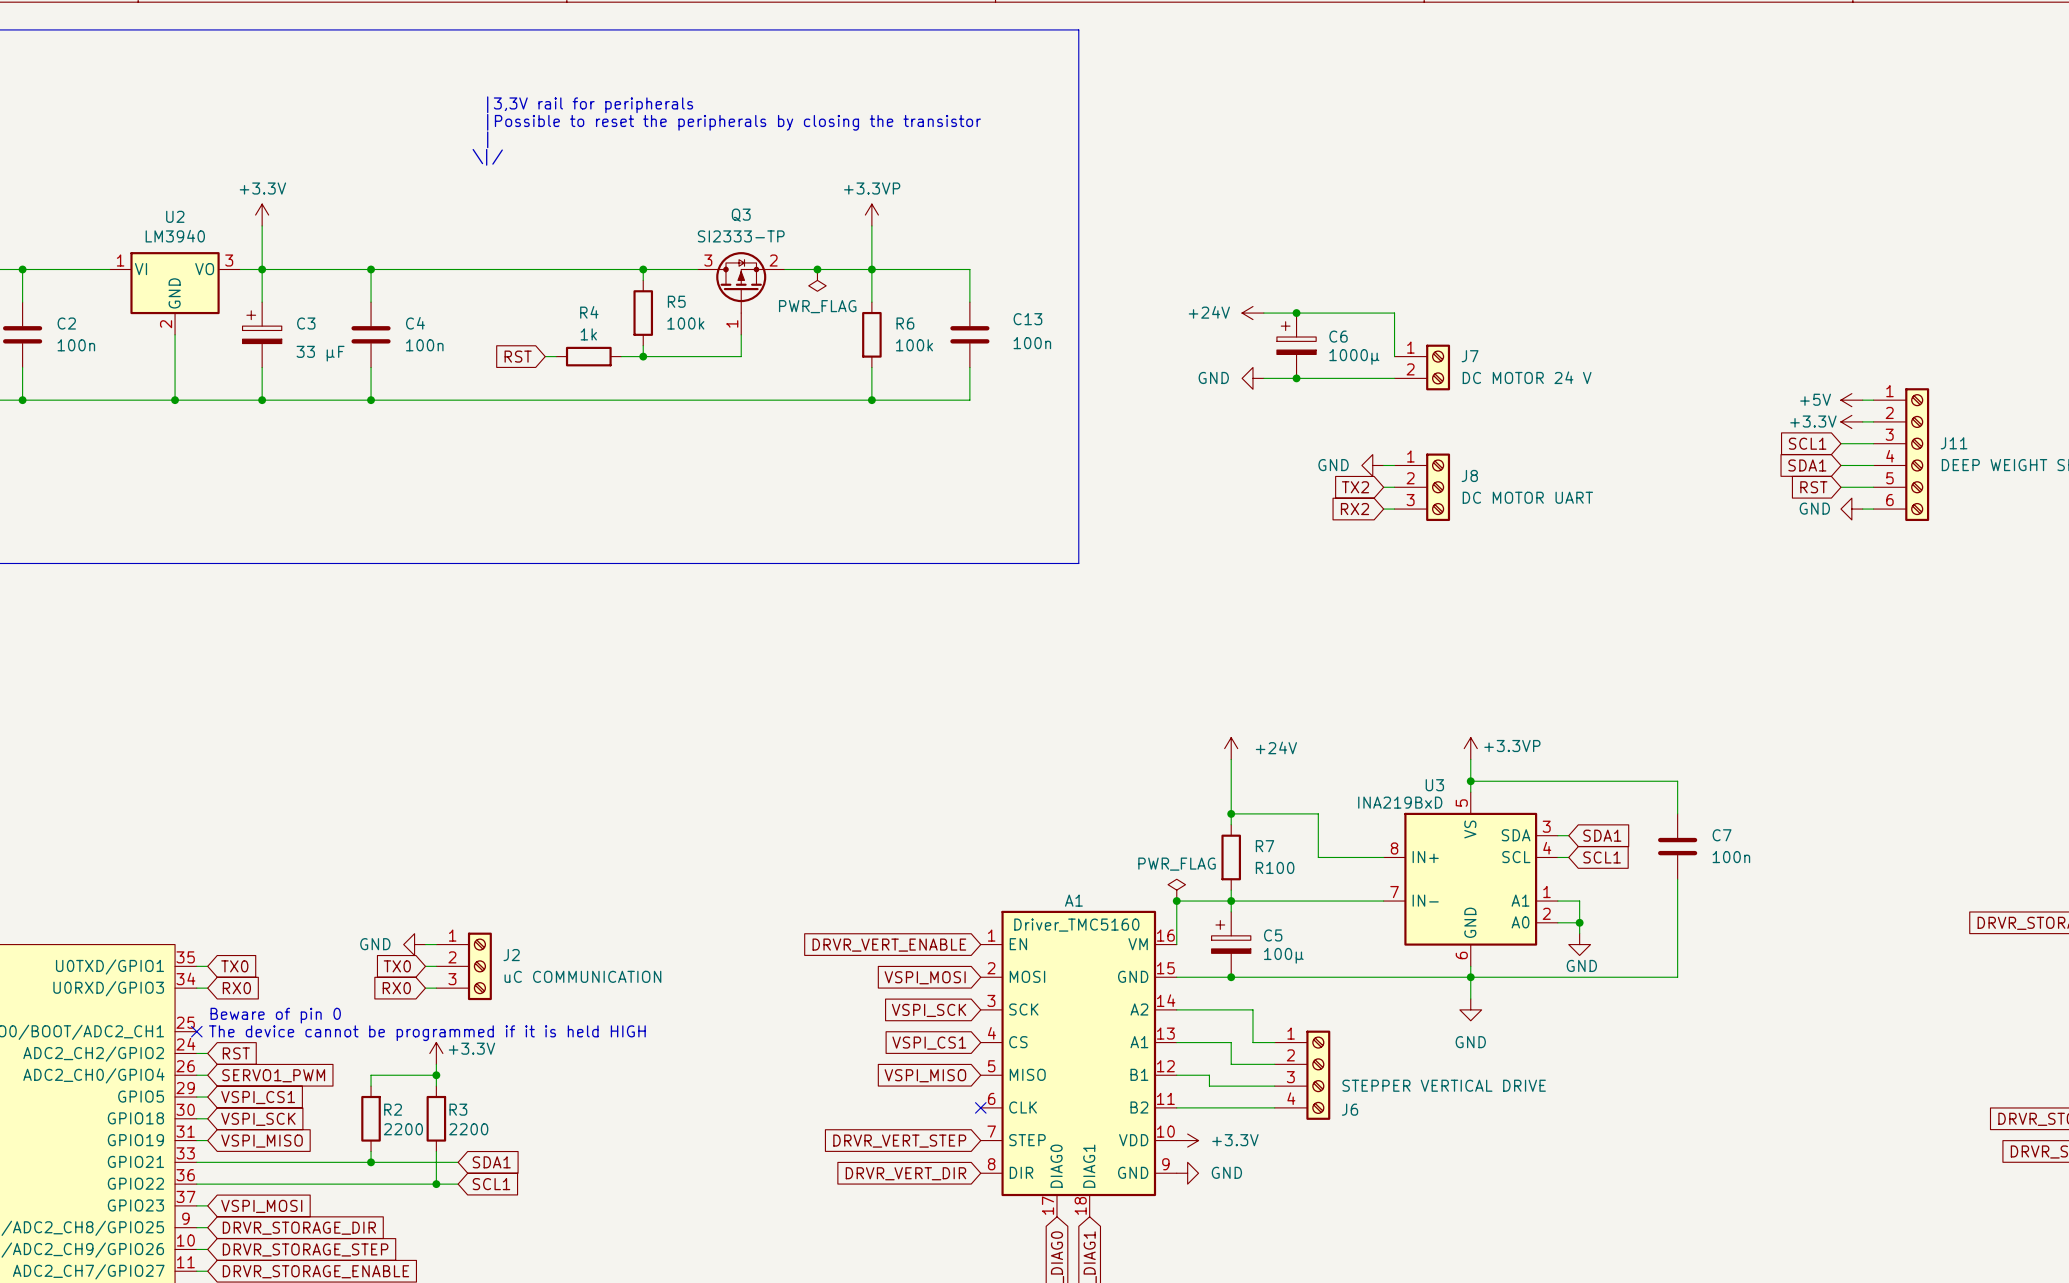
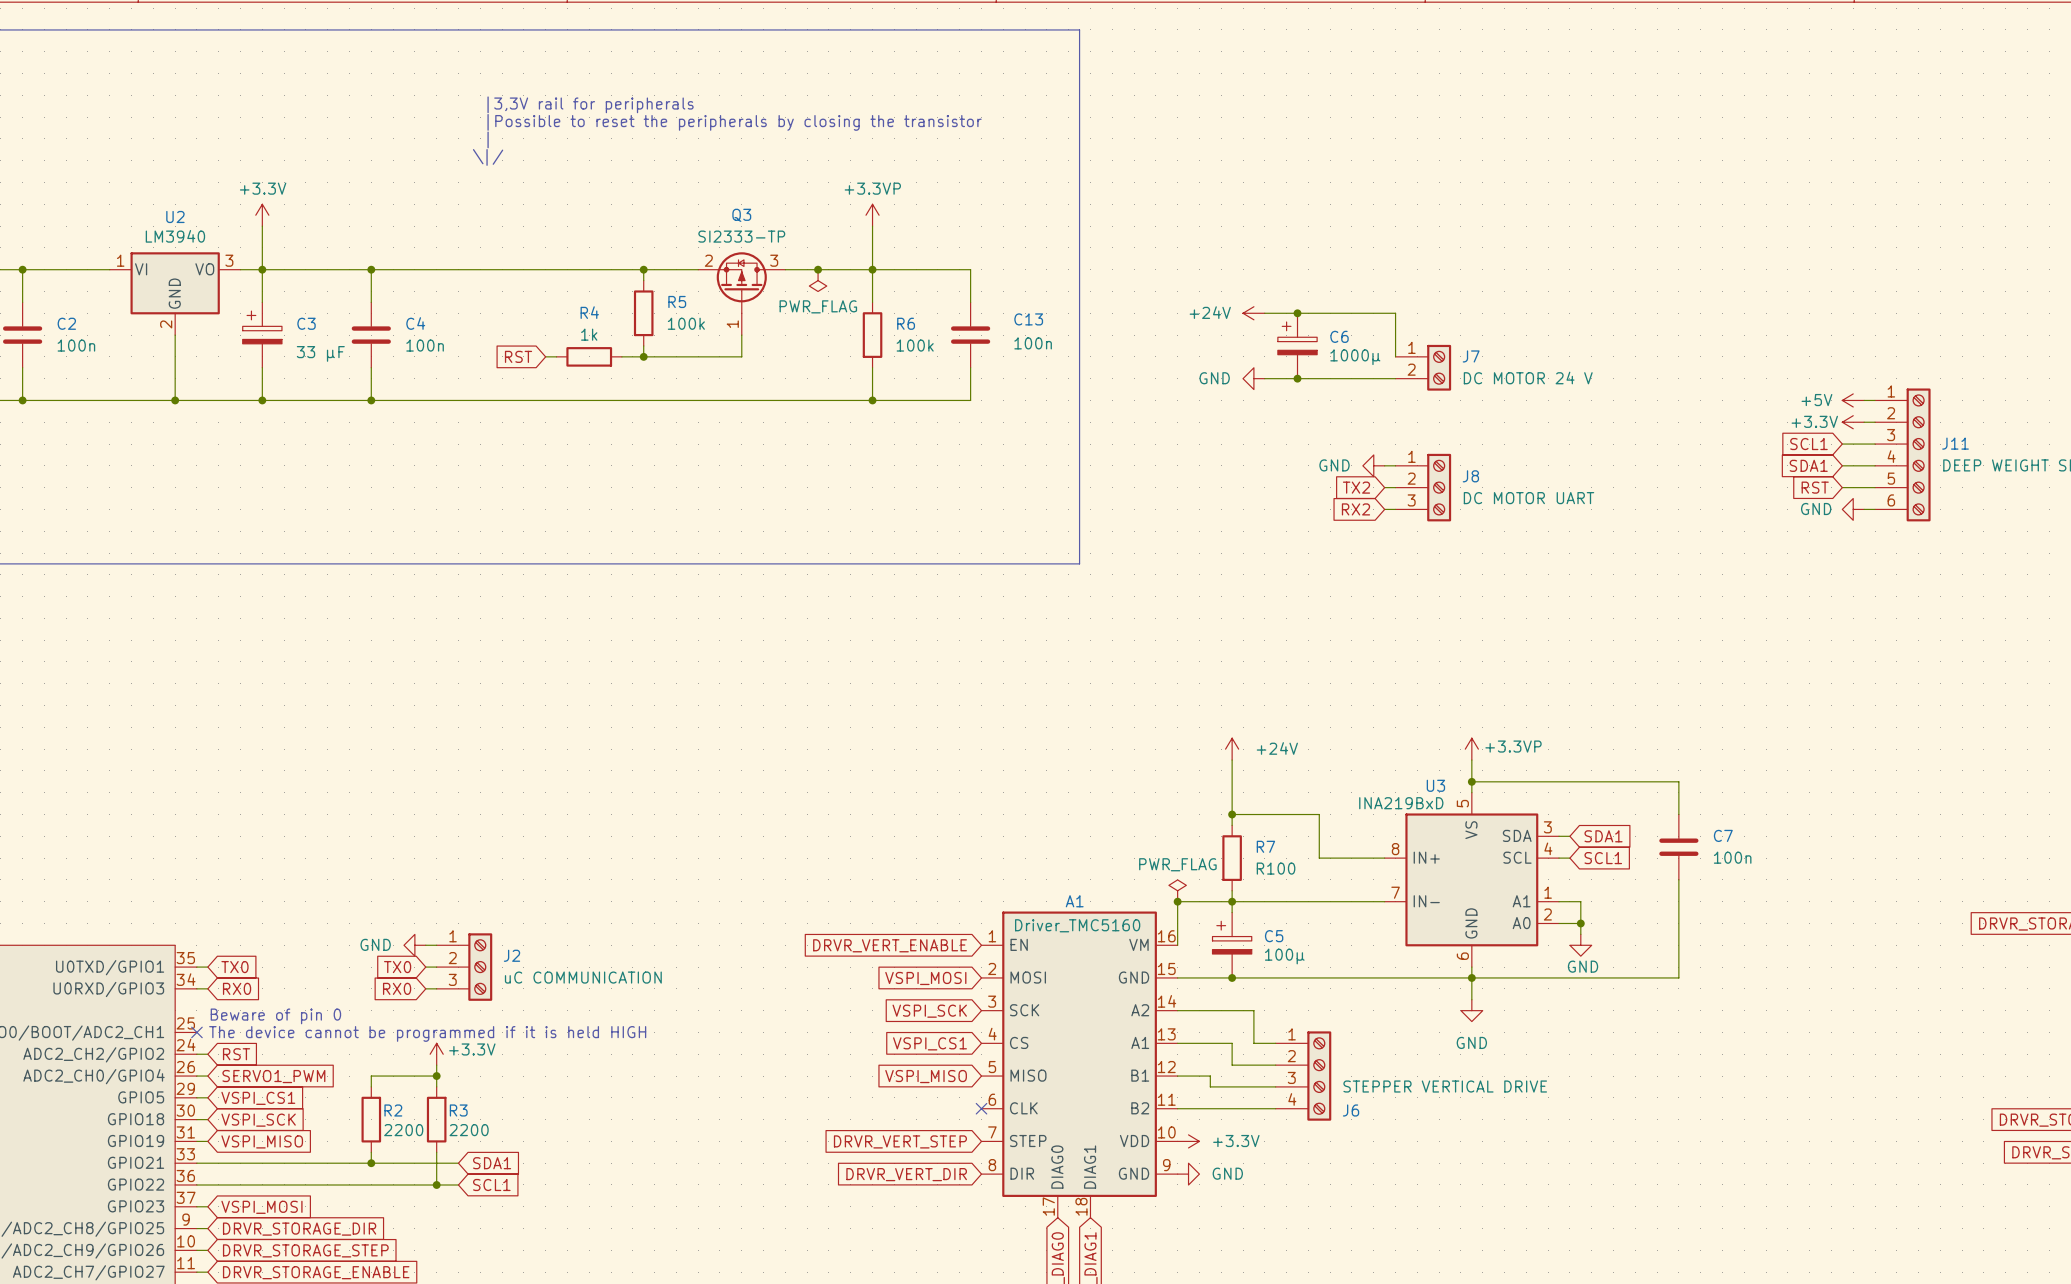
Q3 flip: as is (741, 282) -> left-right (741, 282)

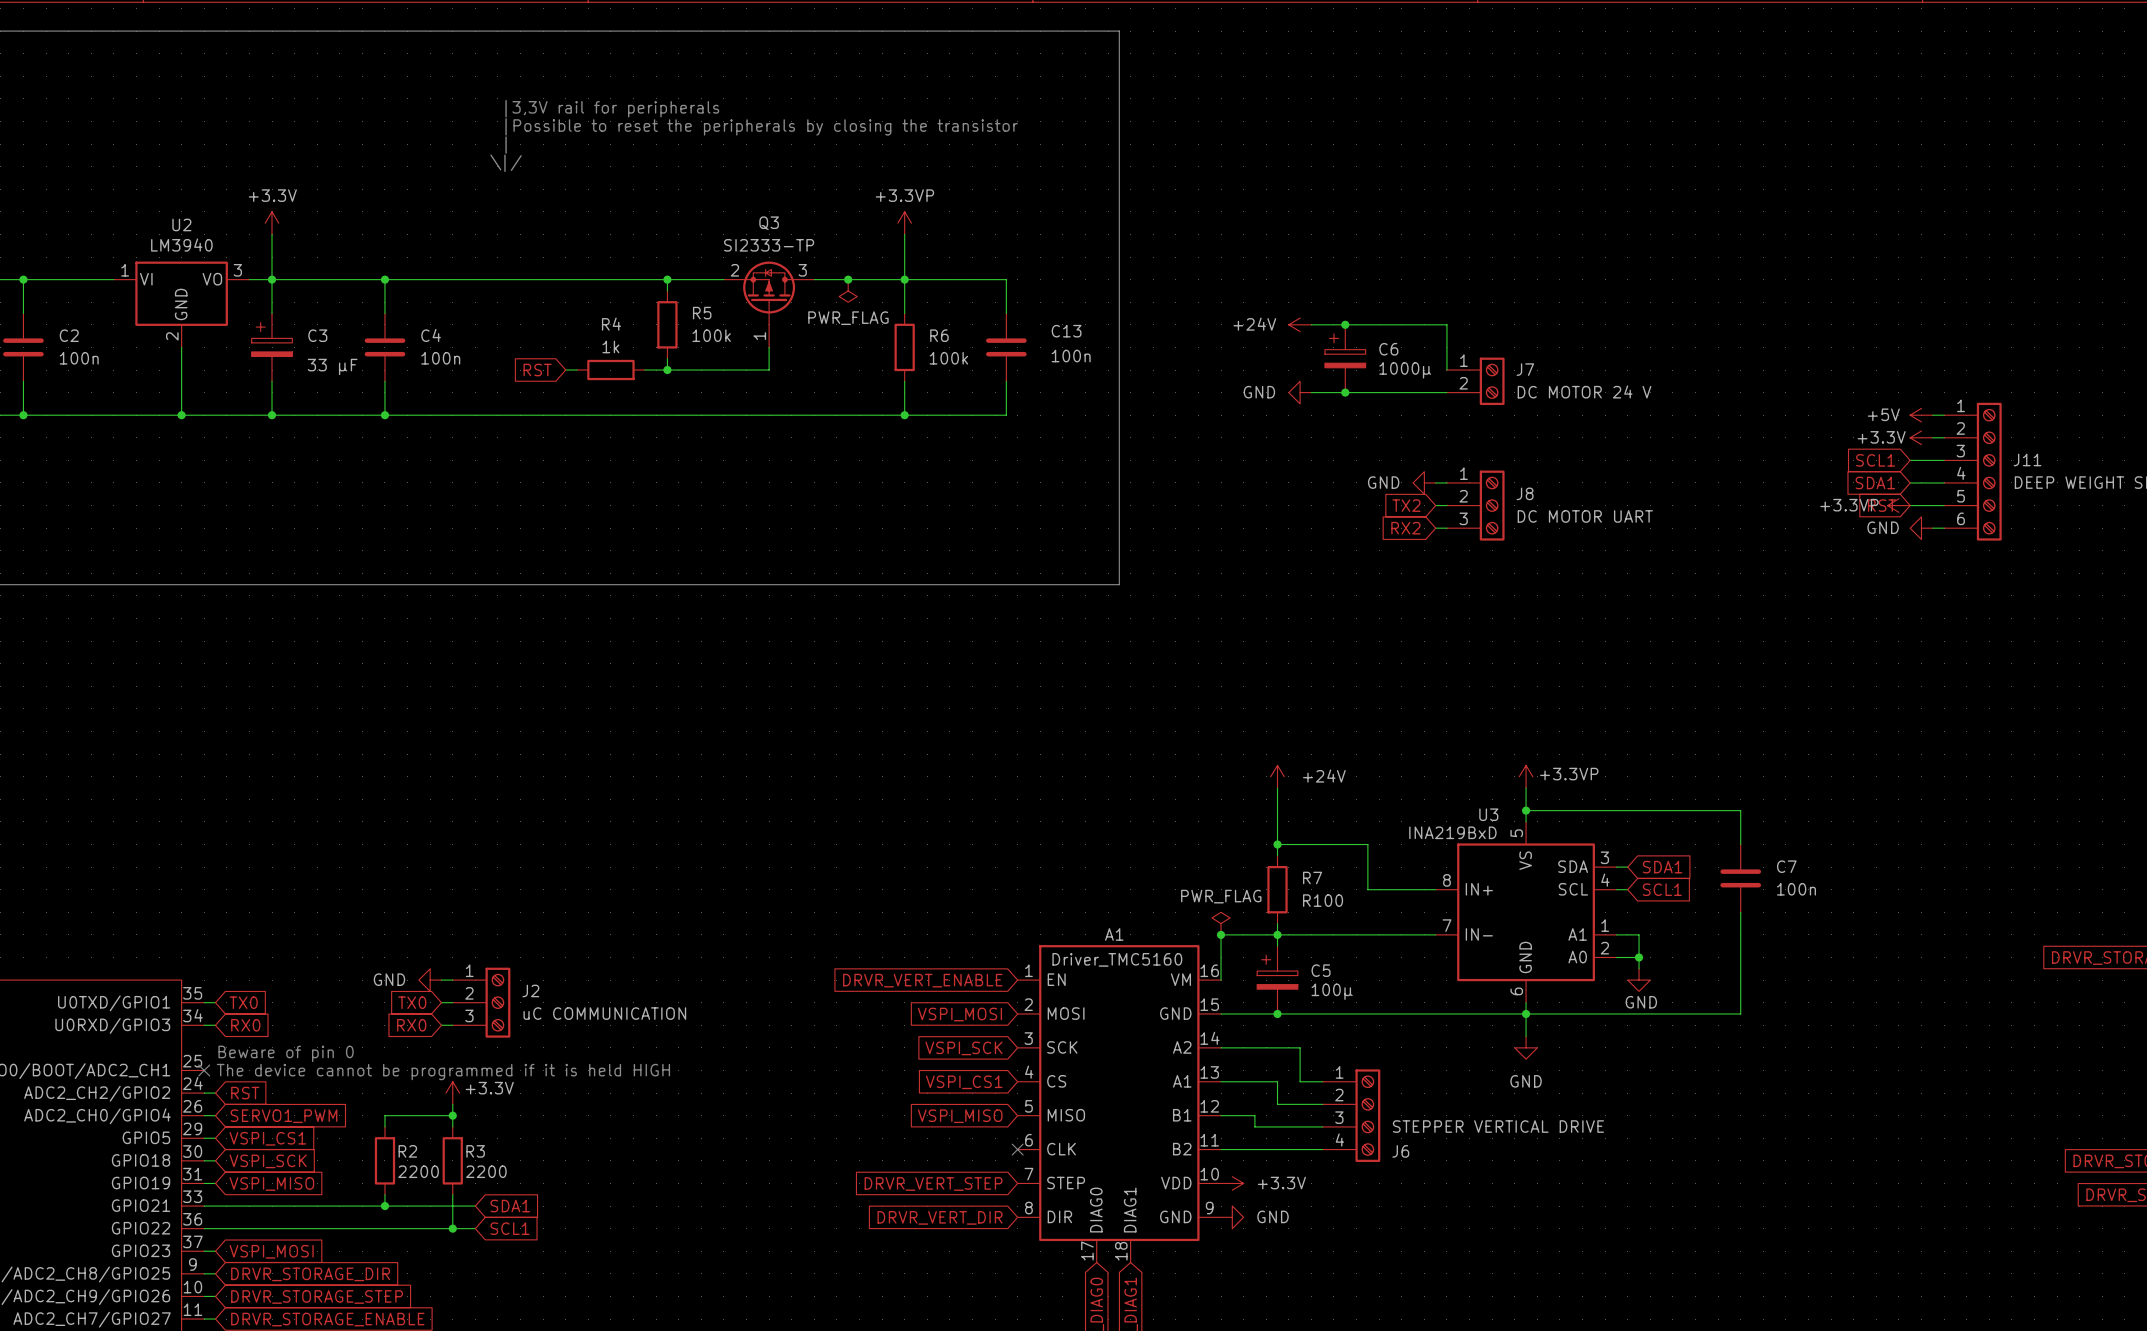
power symbol: none -> +3.3VP (1898, 505)

